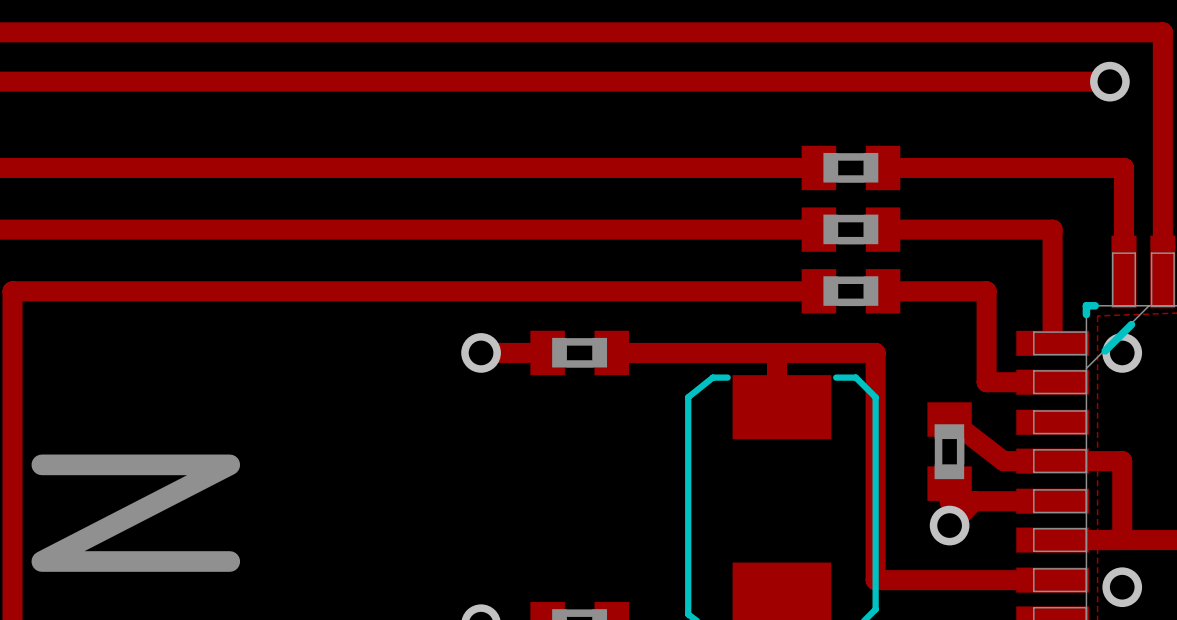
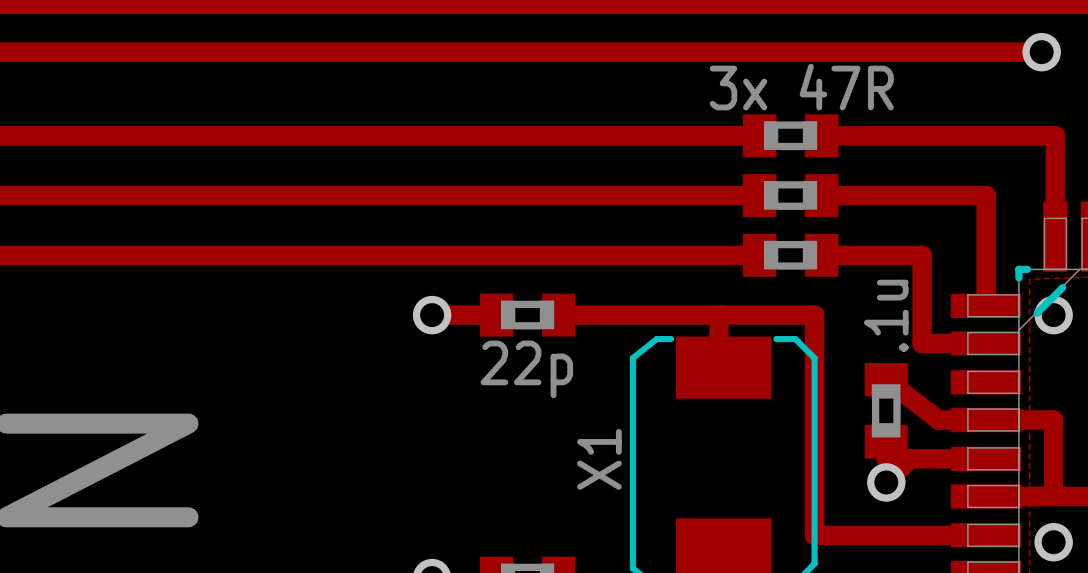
text: none -> 3x 47R (801, 87)
text: none -> .1u (886, 315)
text: none -> 22p (526, 369)
text: none -> X1 (599, 459)

